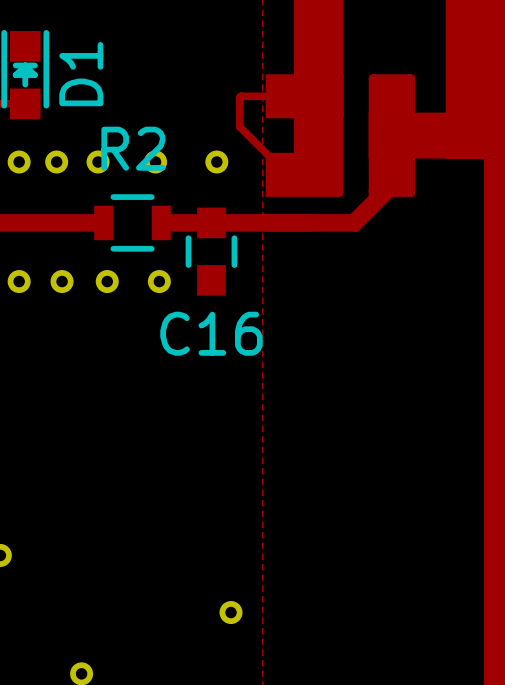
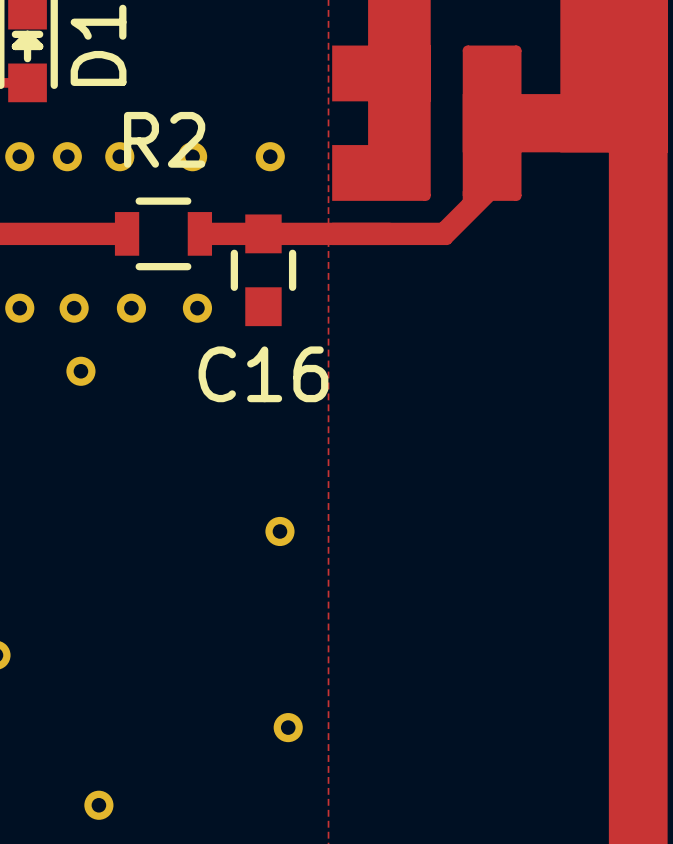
track: (304, 96) (239, 97) (239, 126) (287, 174) (302, 174) -> none
part: none -> (80, 371)
part: none -> (279, 531)

